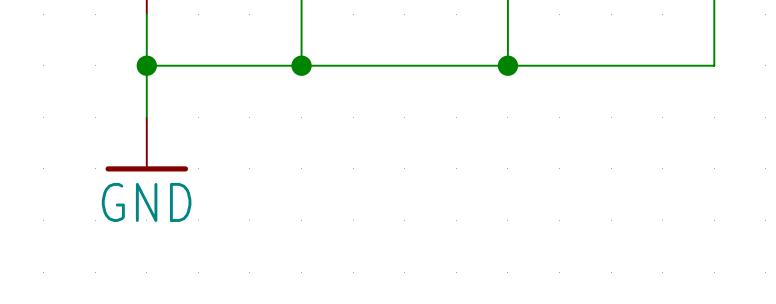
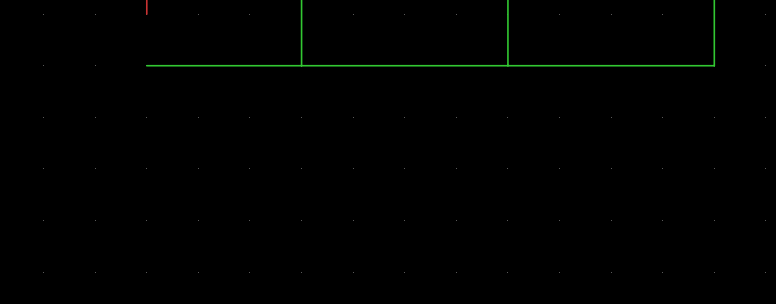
wire: (146, 14) (146, 117) -> none
junction: (146, 65) -> none
junction: (301, 65) -> none
junction: (507, 65) -> none
power symbol: GND (146, 144) -> none

